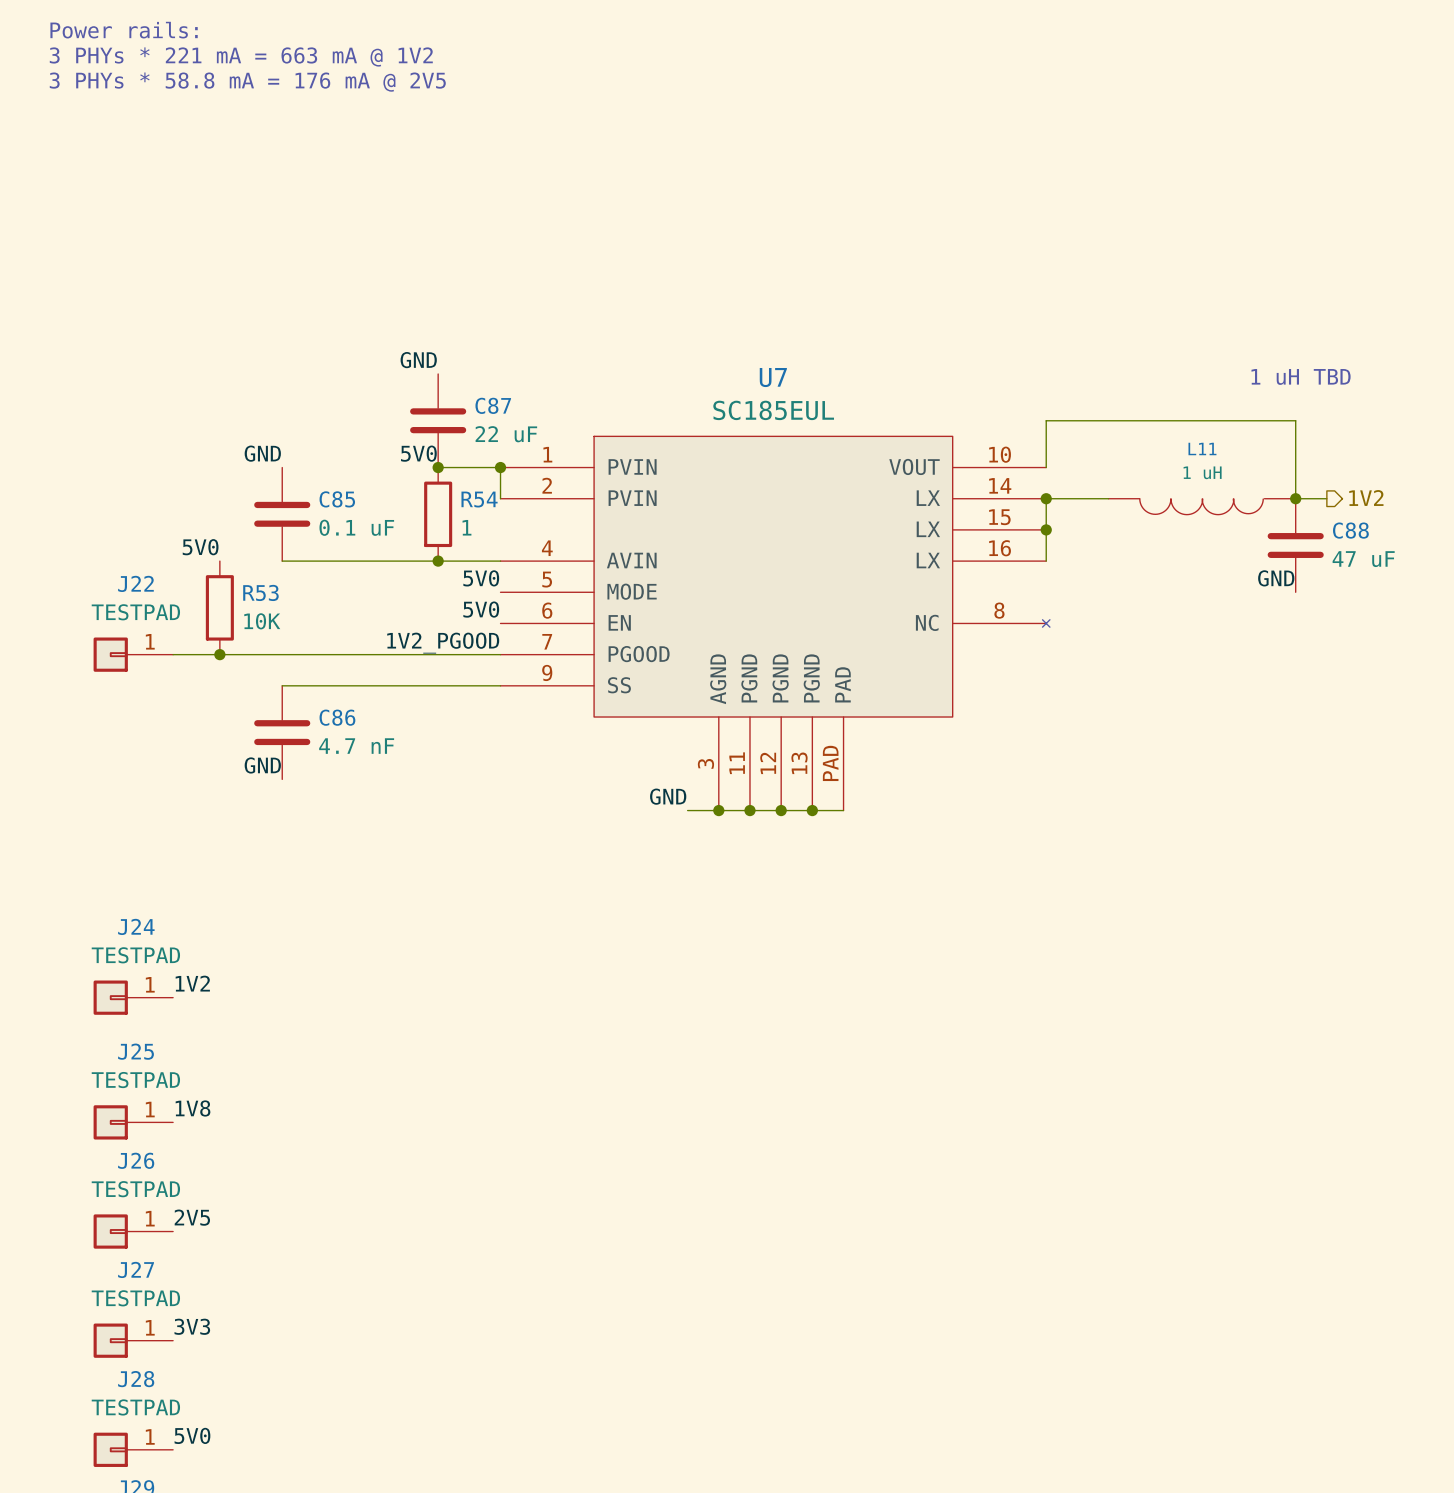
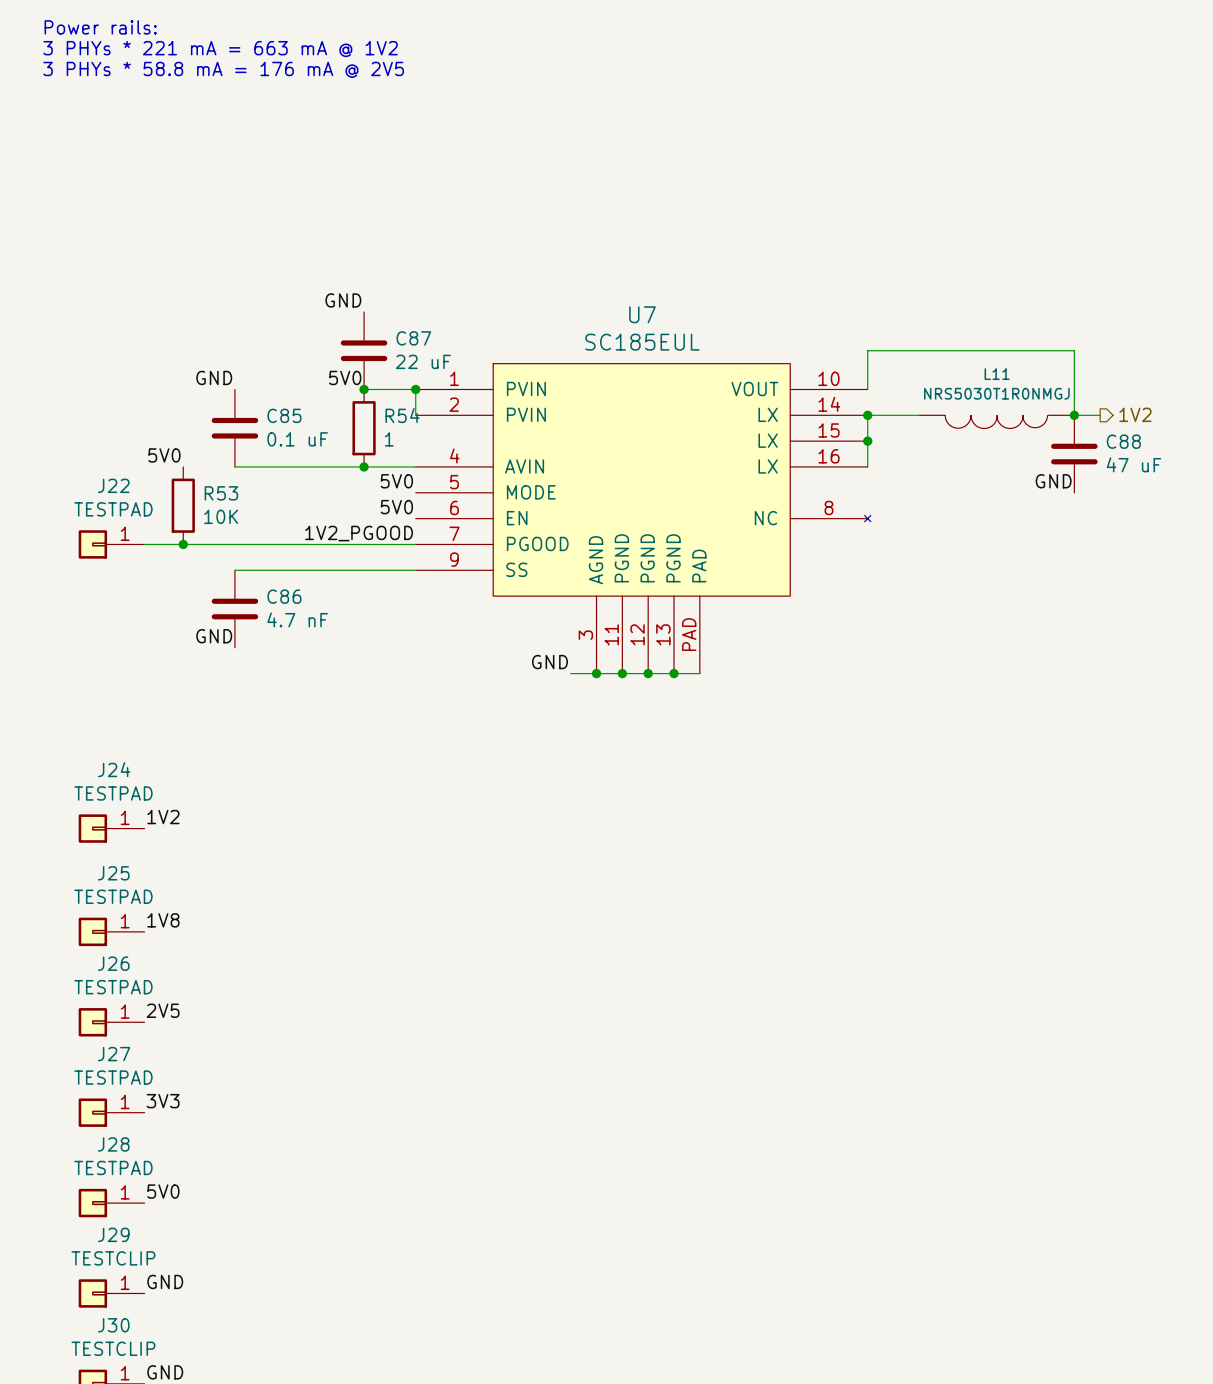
text: 1 uH TBD (1301, 376) -> none
L11 value: 1 uH (1202, 472) -> NRS5030T1R0NMGJ (996, 393)

